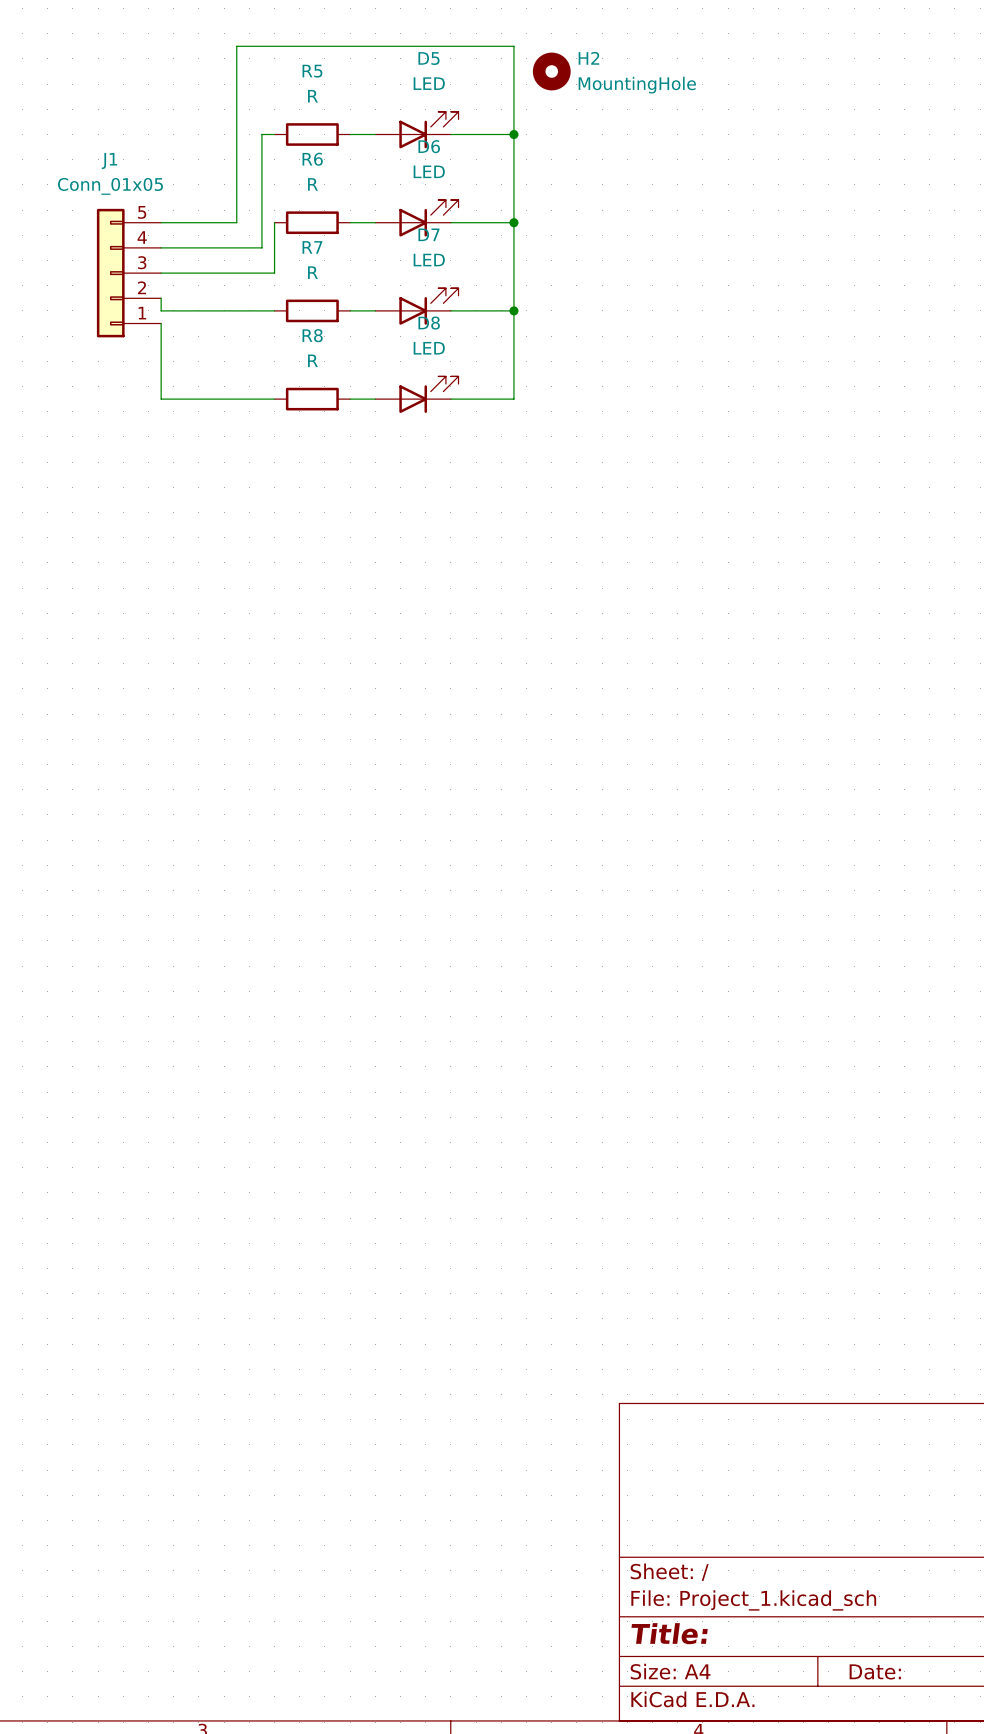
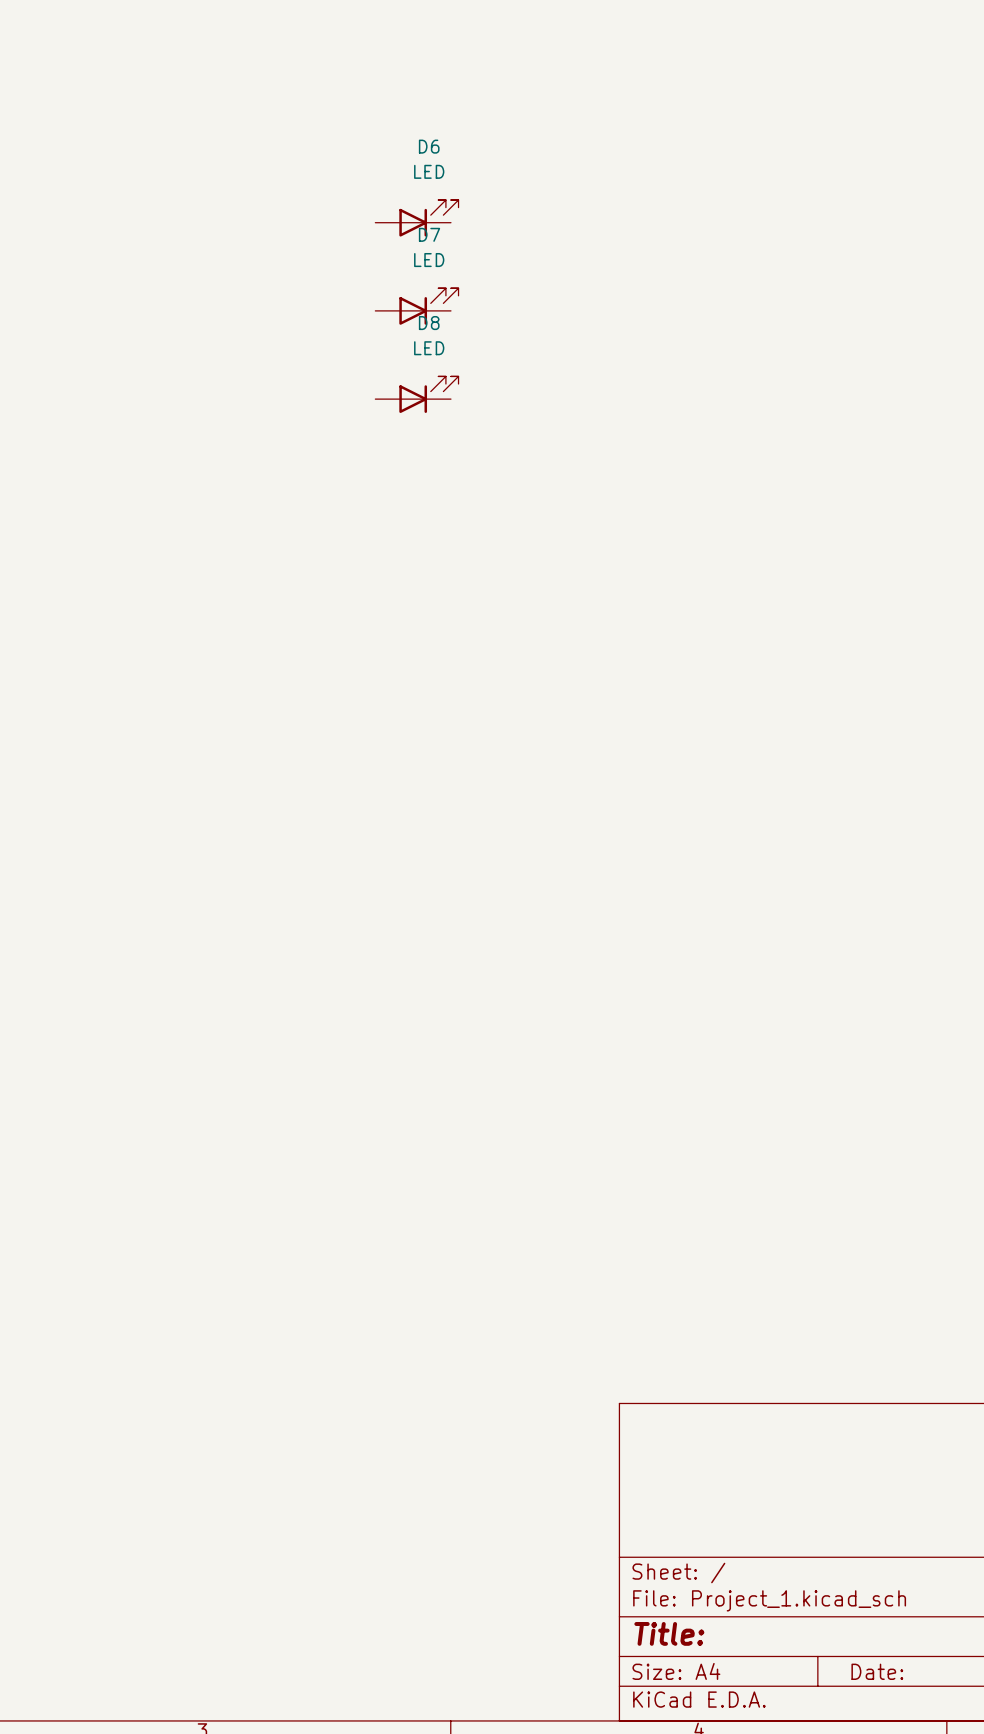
H2: MountingHole (551, 71) -> none
D5: LED (416, 130) -> none
wire: (274, 134) (261, 134) (261, 247) (161, 247) -> none
R5: R (312, 134) -> none
wire: (350, 134) (375, 134) -> none
wire: (450, 134) (513, 134) -> none
junction: (513, 134) -> none
wire: (161, 222) (236, 222) (236, 46) (513, 46) (513, 399) (450, 399) -> none
wire: (274, 222) (274, 273) (161, 273) -> none
R6: R (312, 222) -> none
wire: (350, 222) (375, 222) -> none
wire: (450, 222) (513, 222) -> none
junction: (513, 222) -> none
J1: Conn_01x05 (129, 273) -> none
wire: (161, 298) (161, 310) (274, 310) -> none
R7: R (312, 310) -> none
wire: (350, 310) (375, 310) -> none
wire: (450, 310) (513, 310) -> none
junction: (513, 310) -> none
wire: (161, 323) (161, 399) (274, 399) -> none
R8: R (312, 399) -> none
wire: (350, 399) (375, 399) -> none

